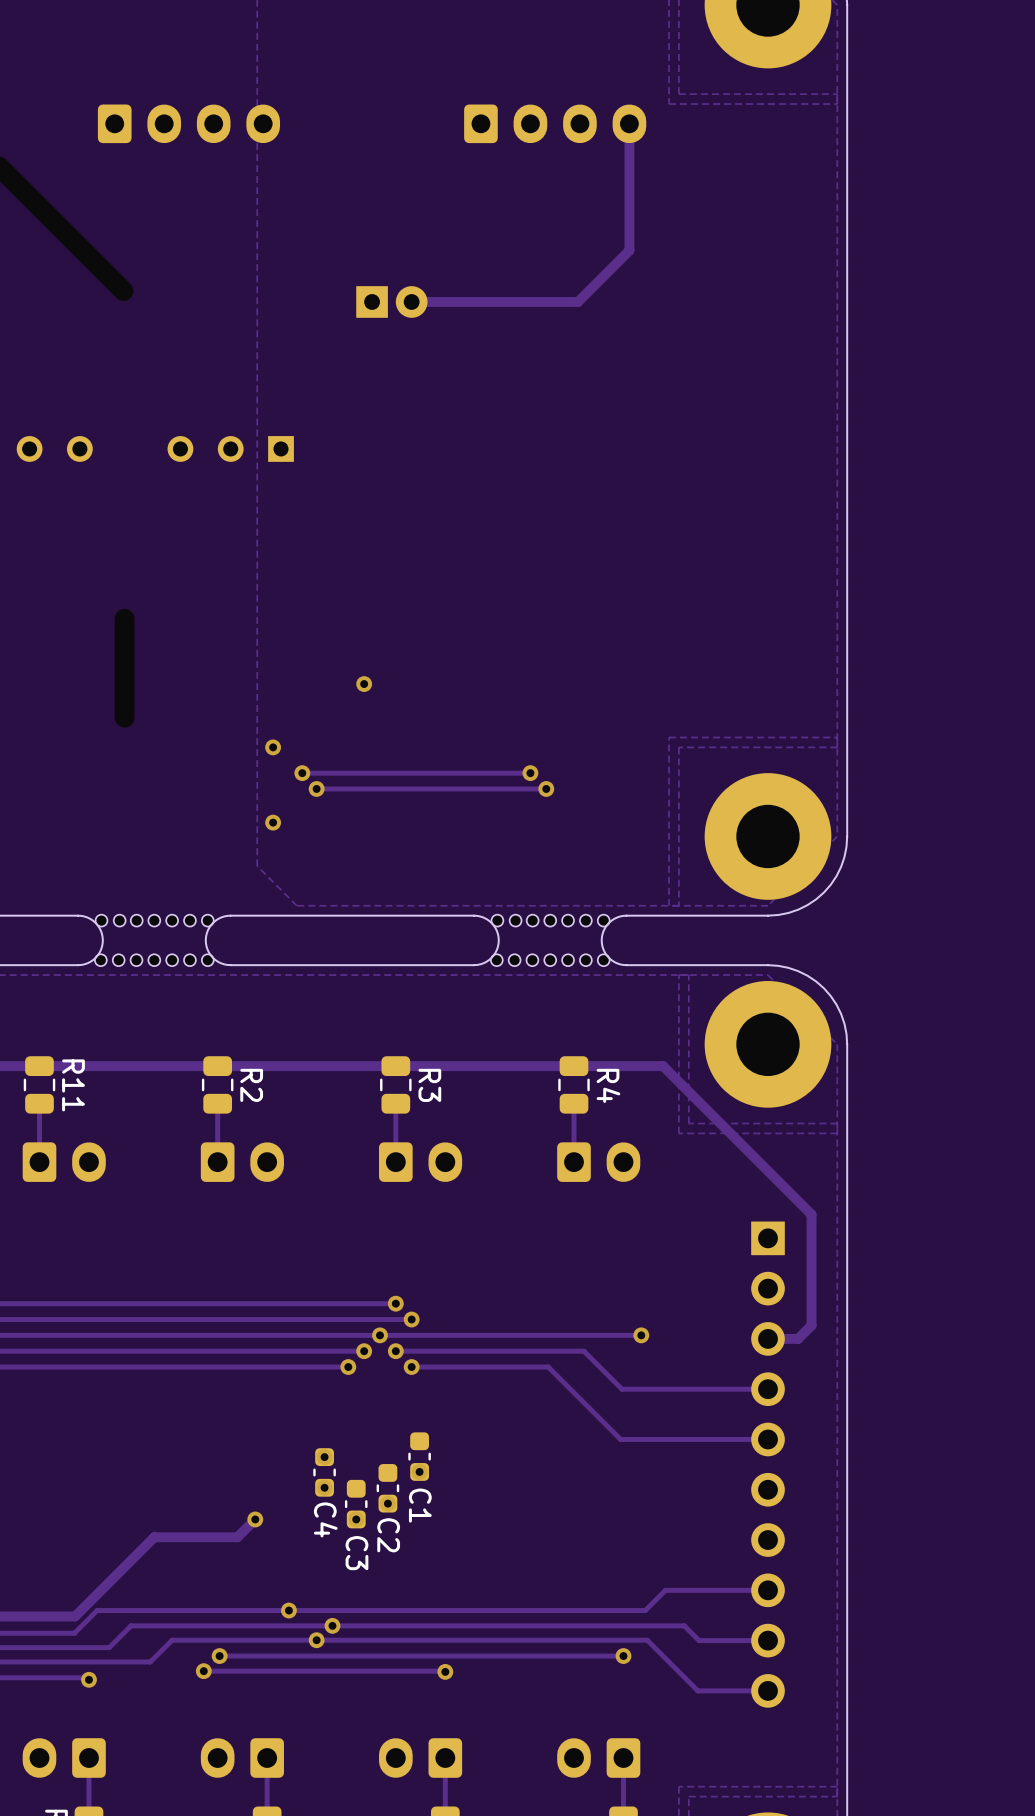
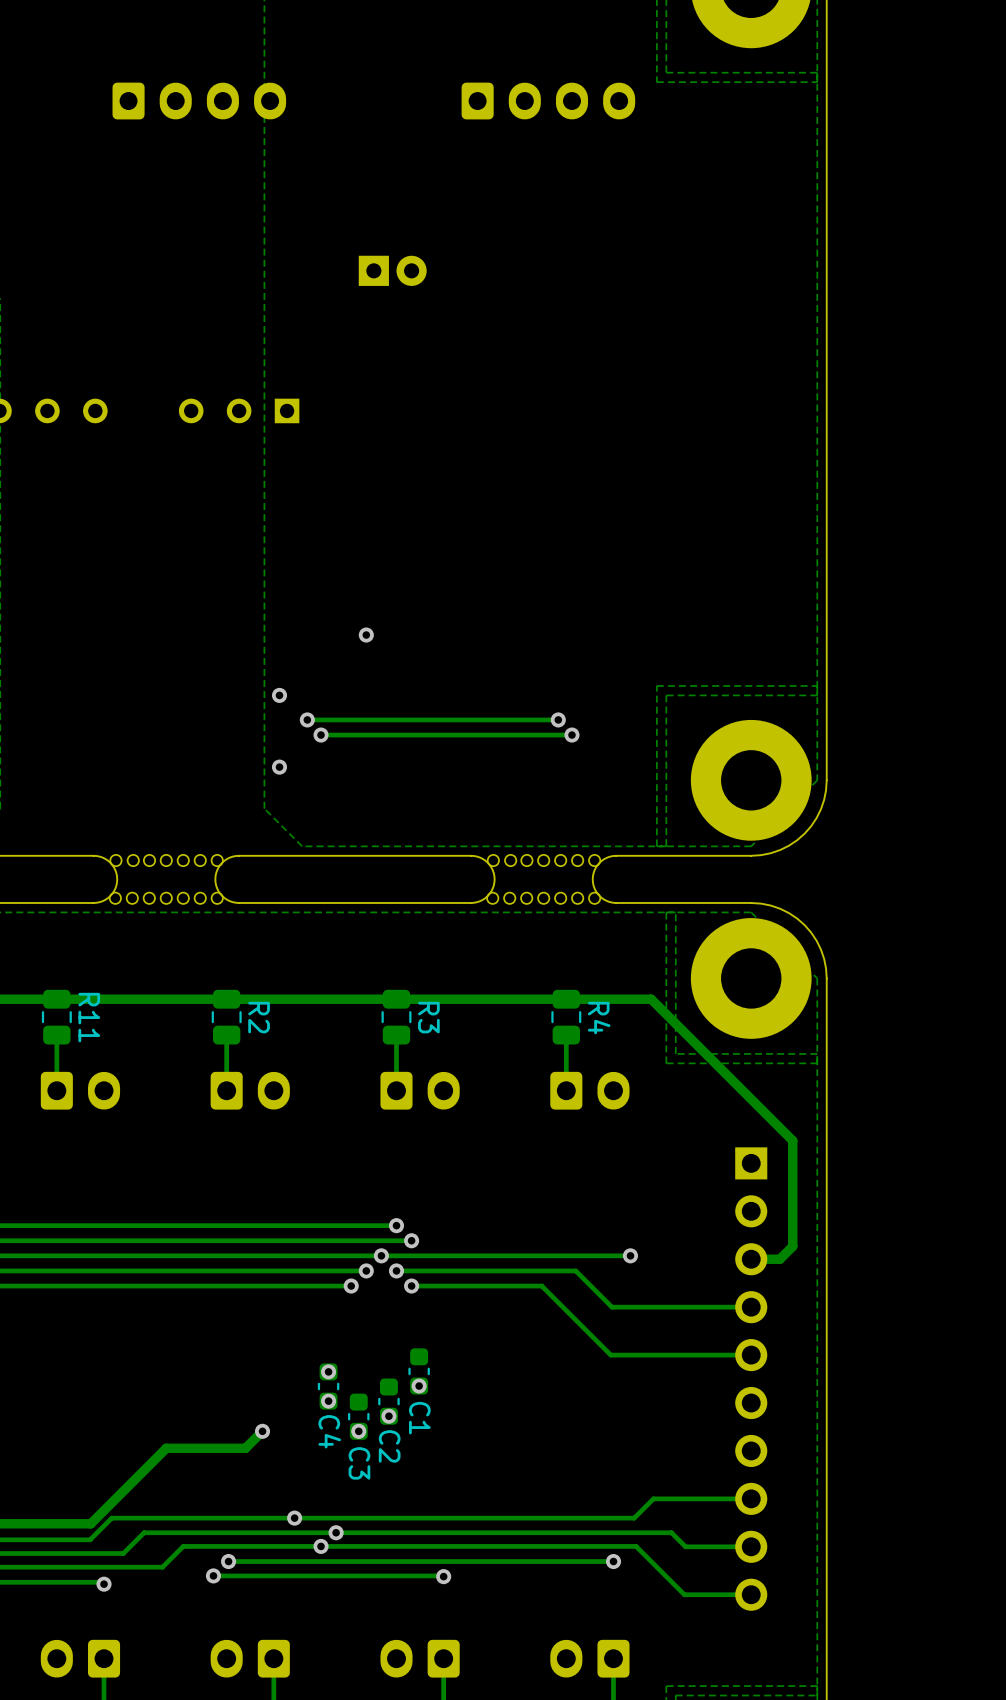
track: (629, 123) (629, 250) (577, 301) (411, 301) -> none
via: (530, 773) -> none
track: none -> (558, 719) (524, 719)
via: none -> (558, 719)
via: (546, 788) -> none
track: none -> (571, 735) (539, 735)
via: none -> (571, 735)

